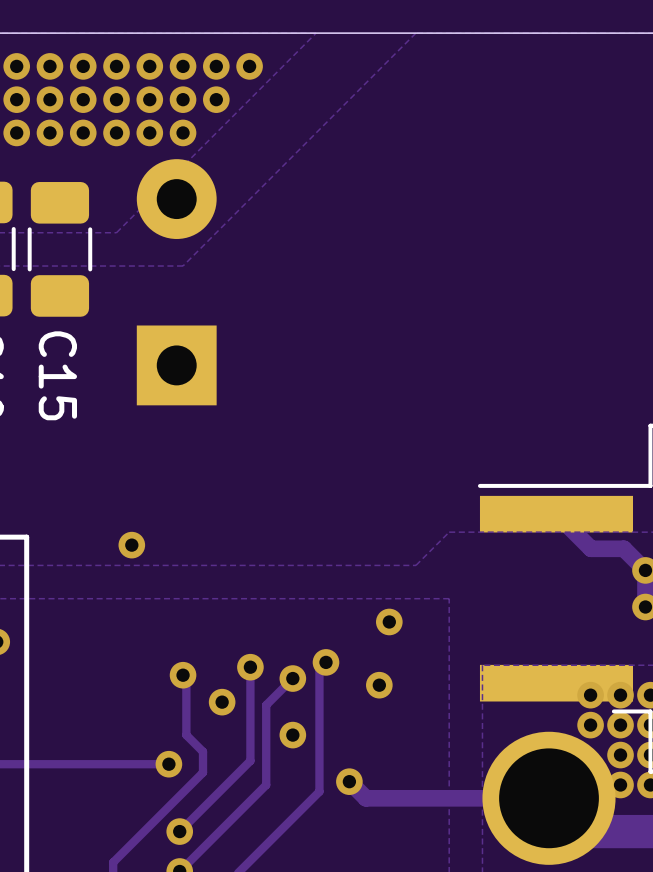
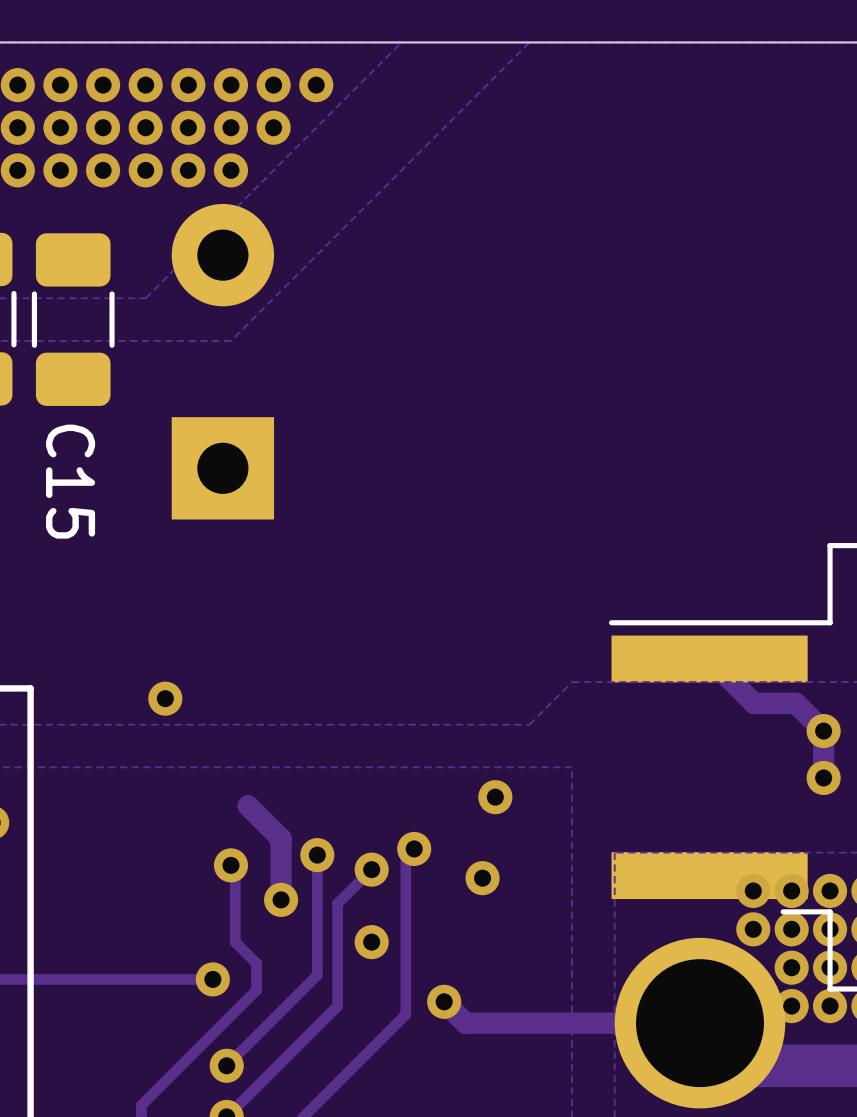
track: none -> (248, 805) (281, 838) (281, 899)

